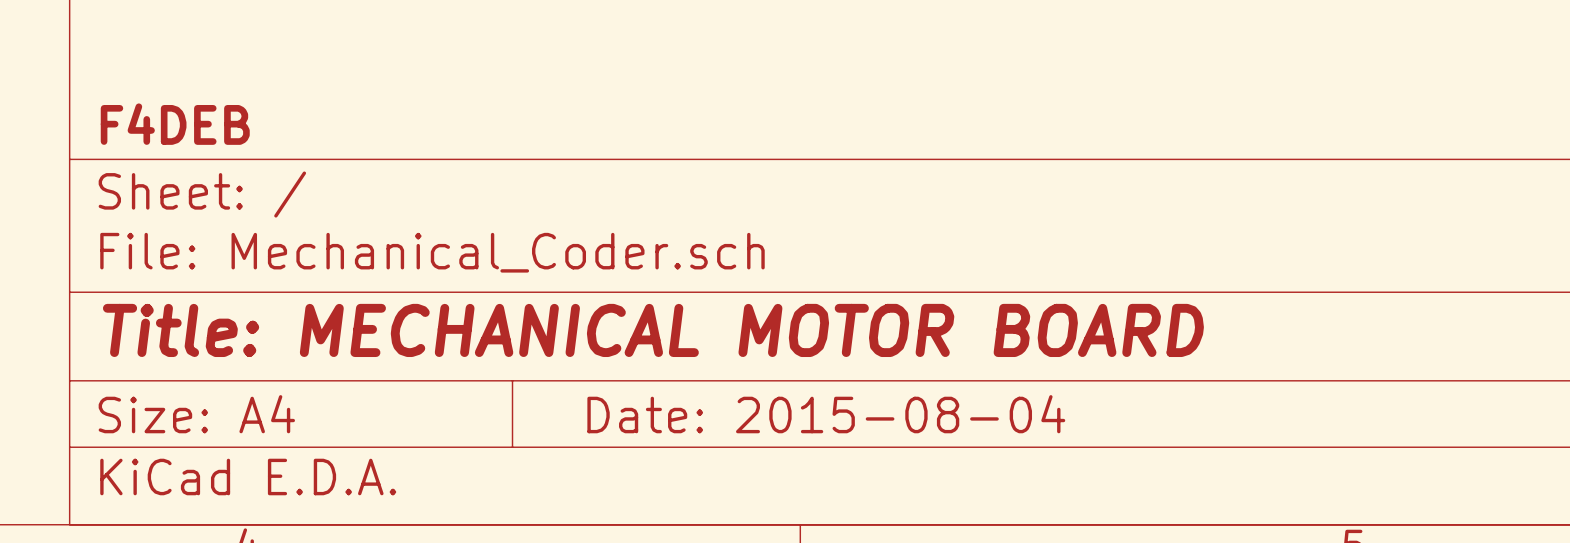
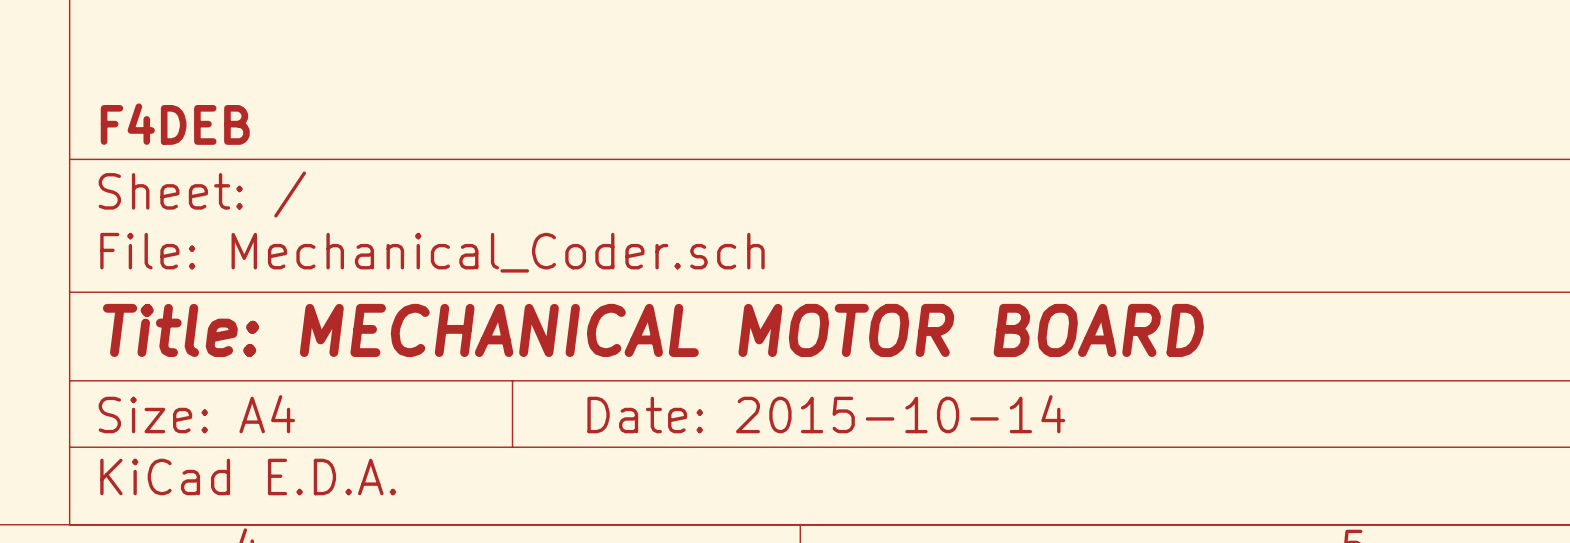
title block: Date: 2015-08-04 (826, 414) -> Date: 2015-10-14 (826, 414)

